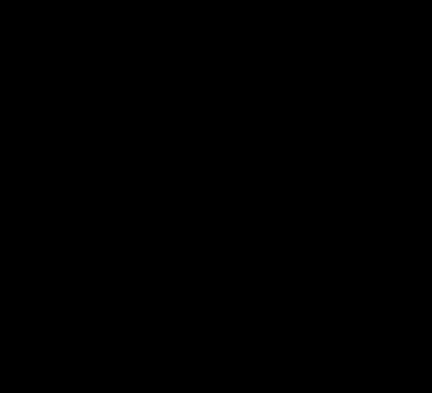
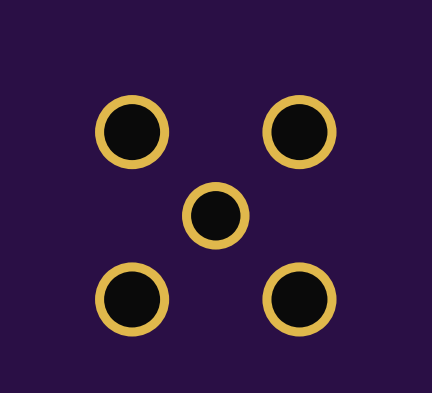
part: none -> (215, 215)

